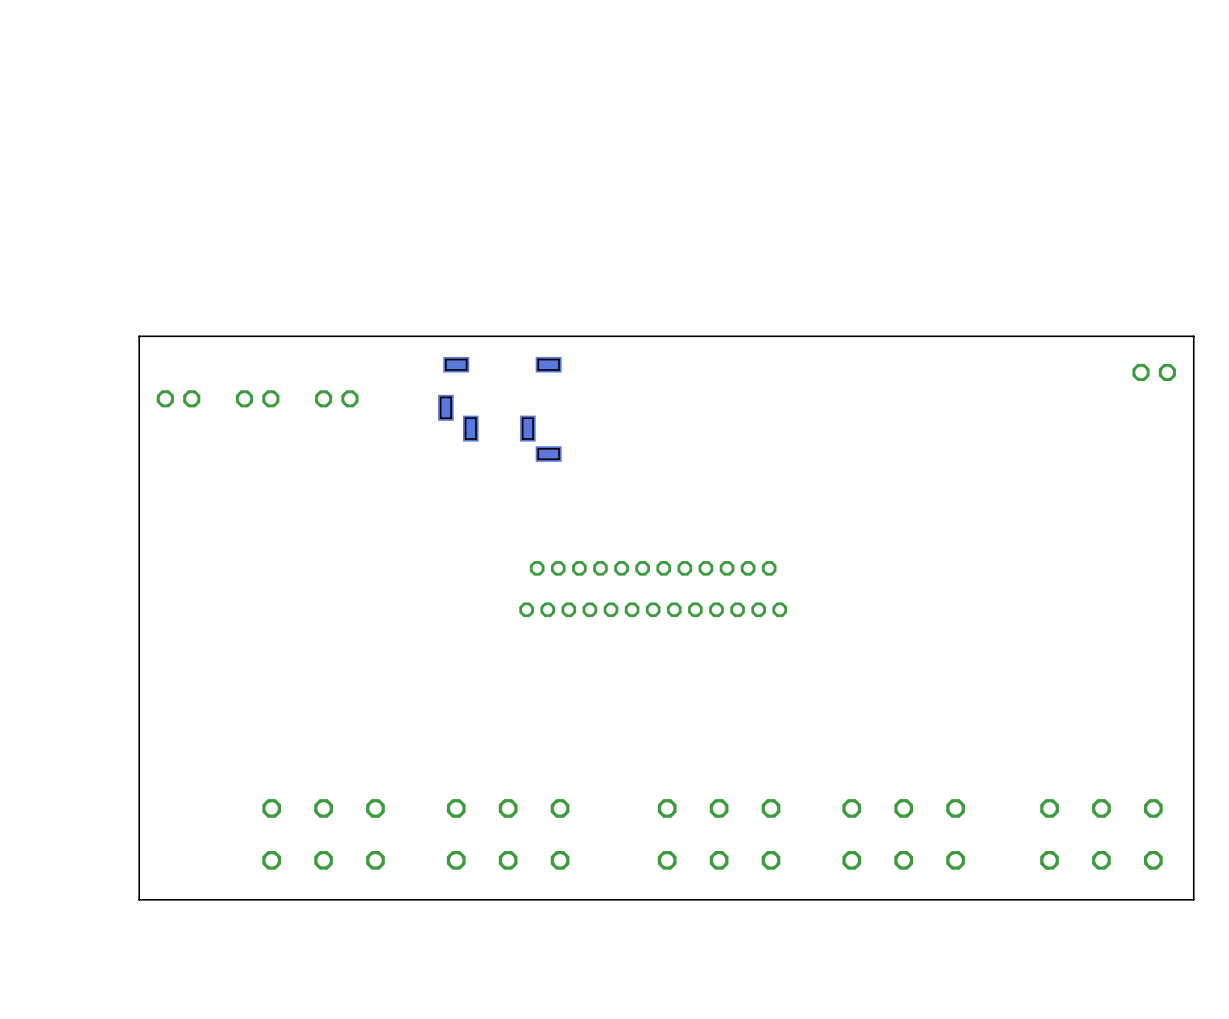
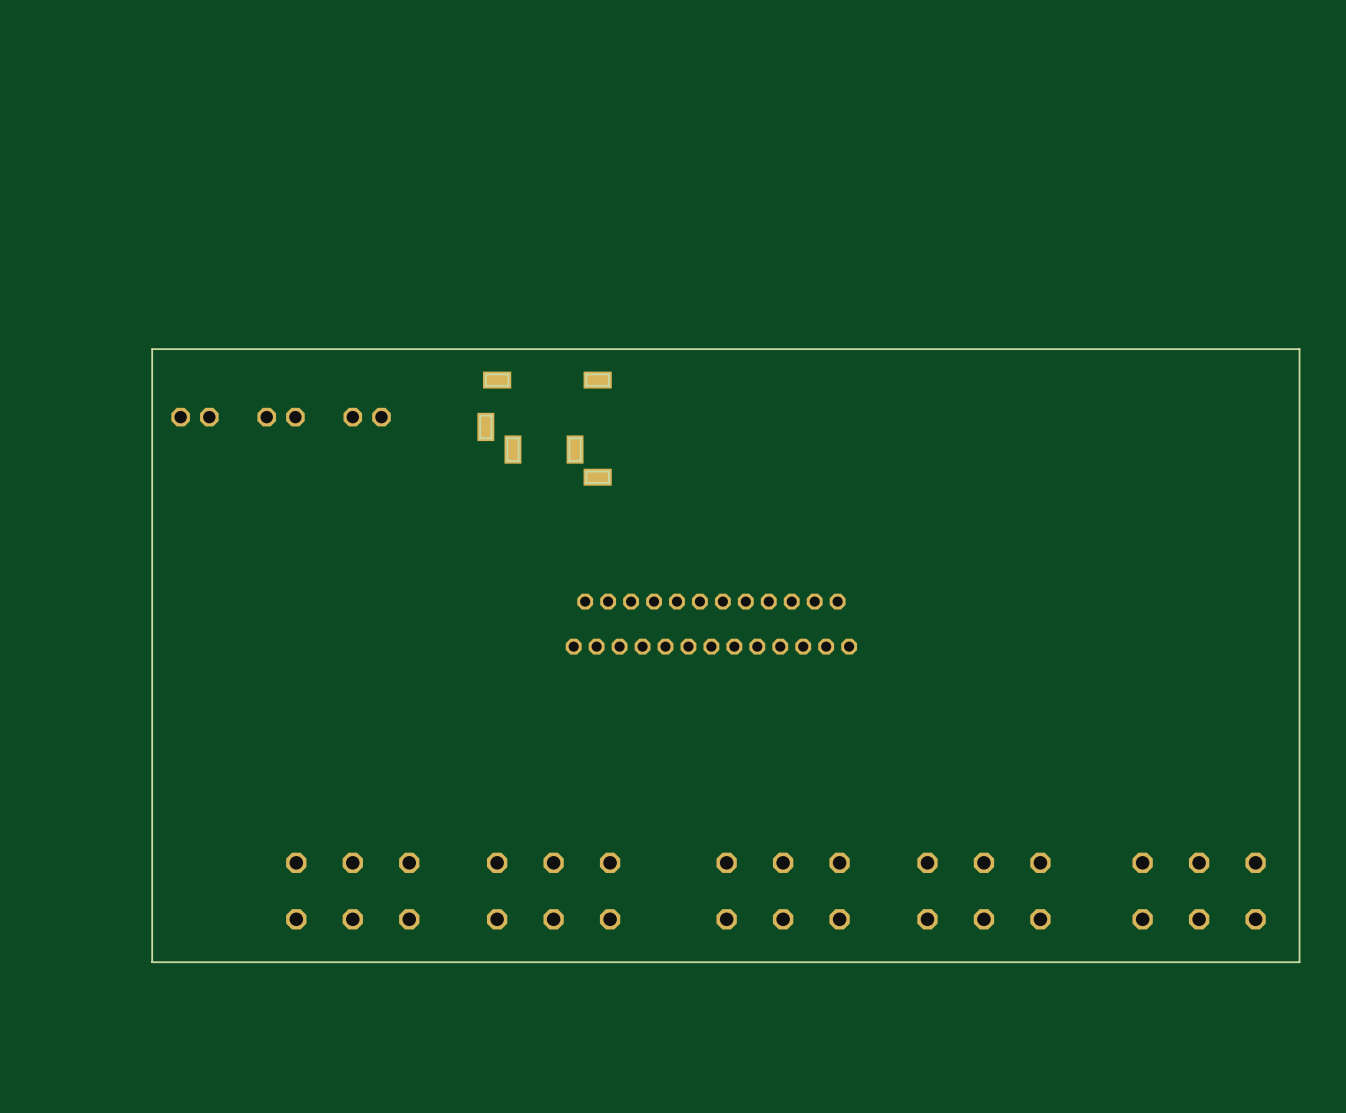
part: (1154, 372) -> none

